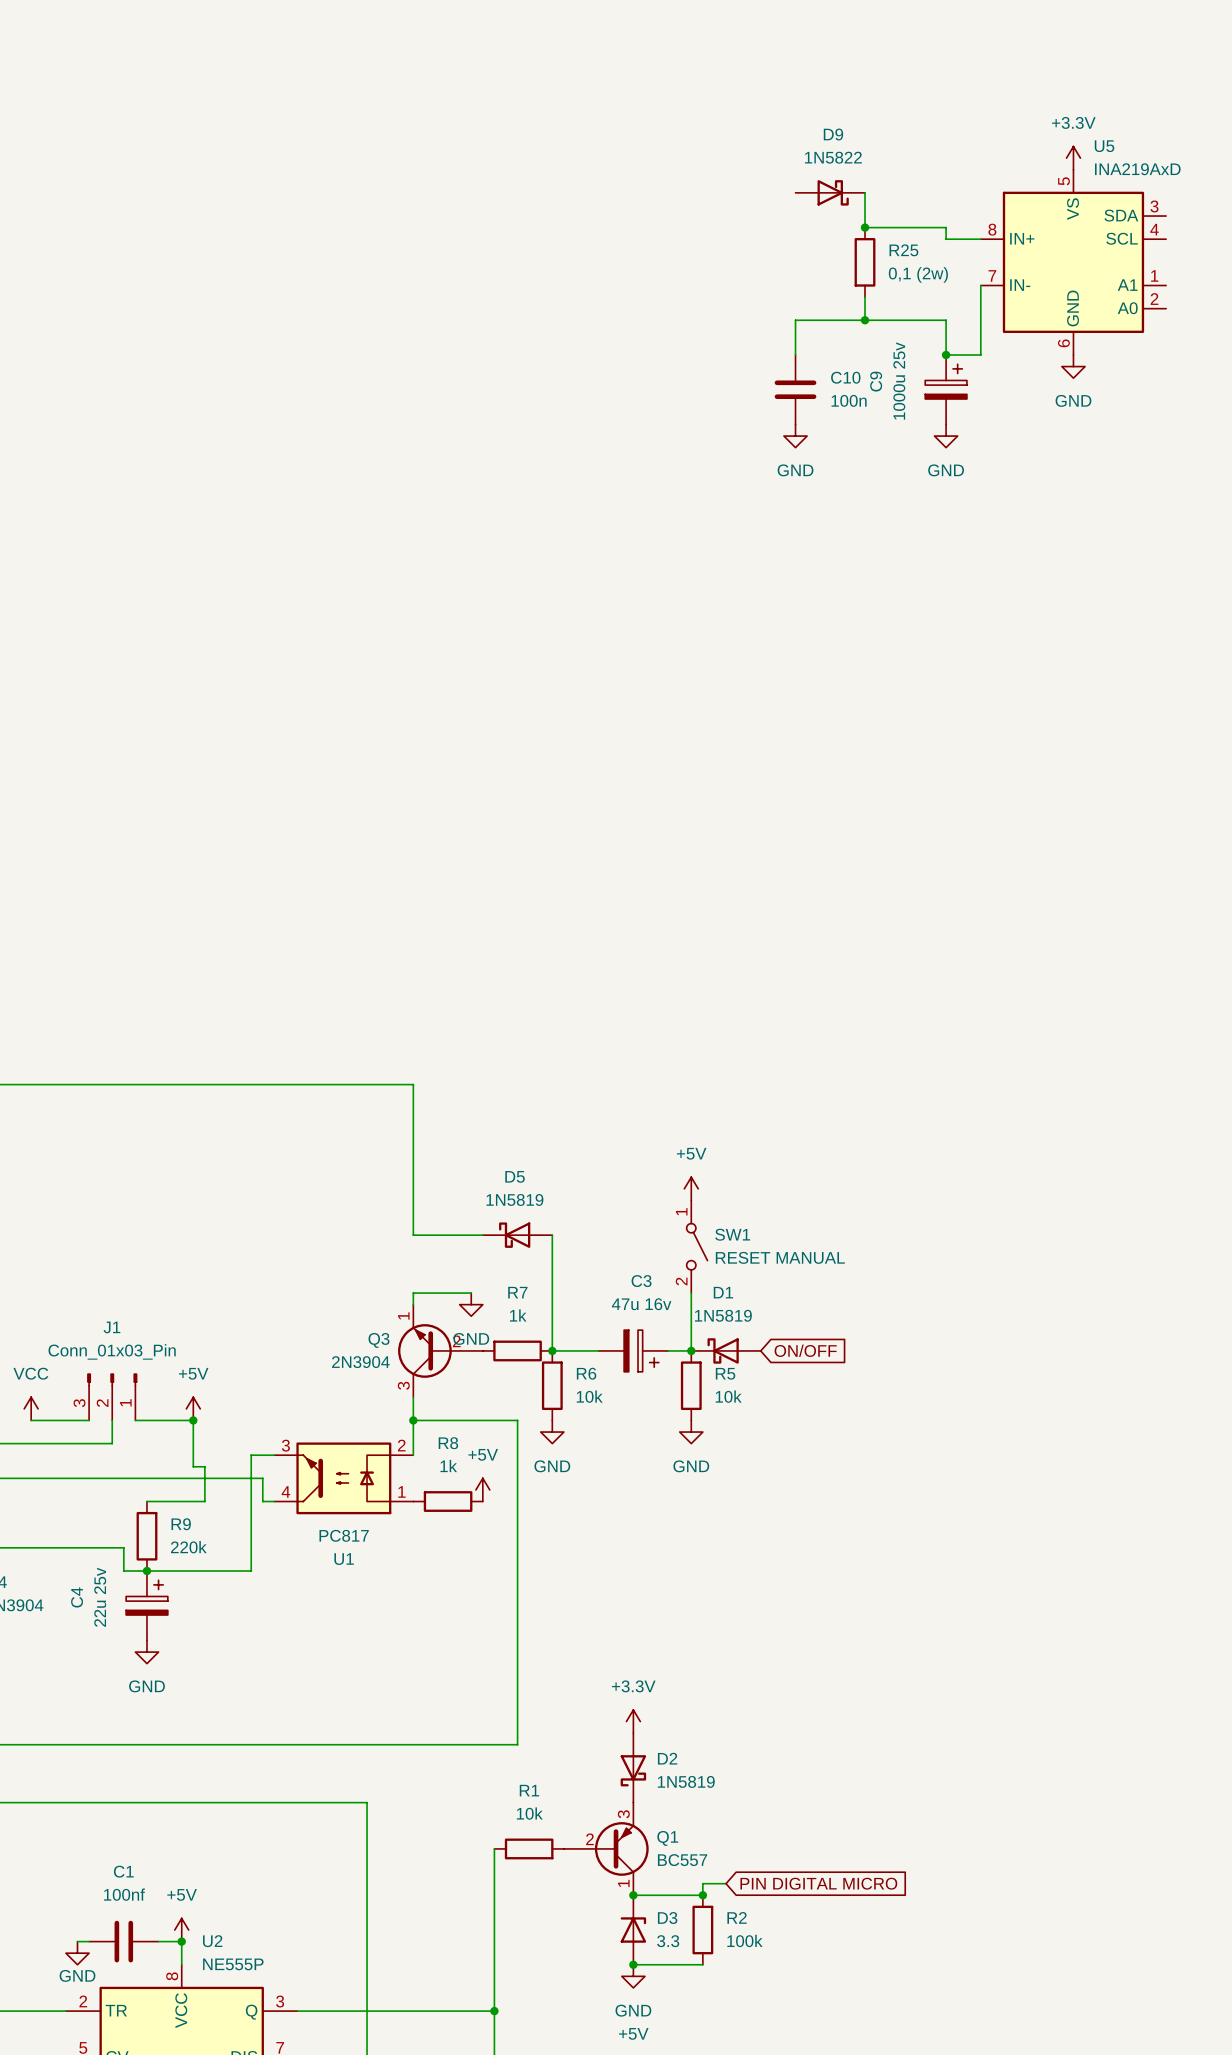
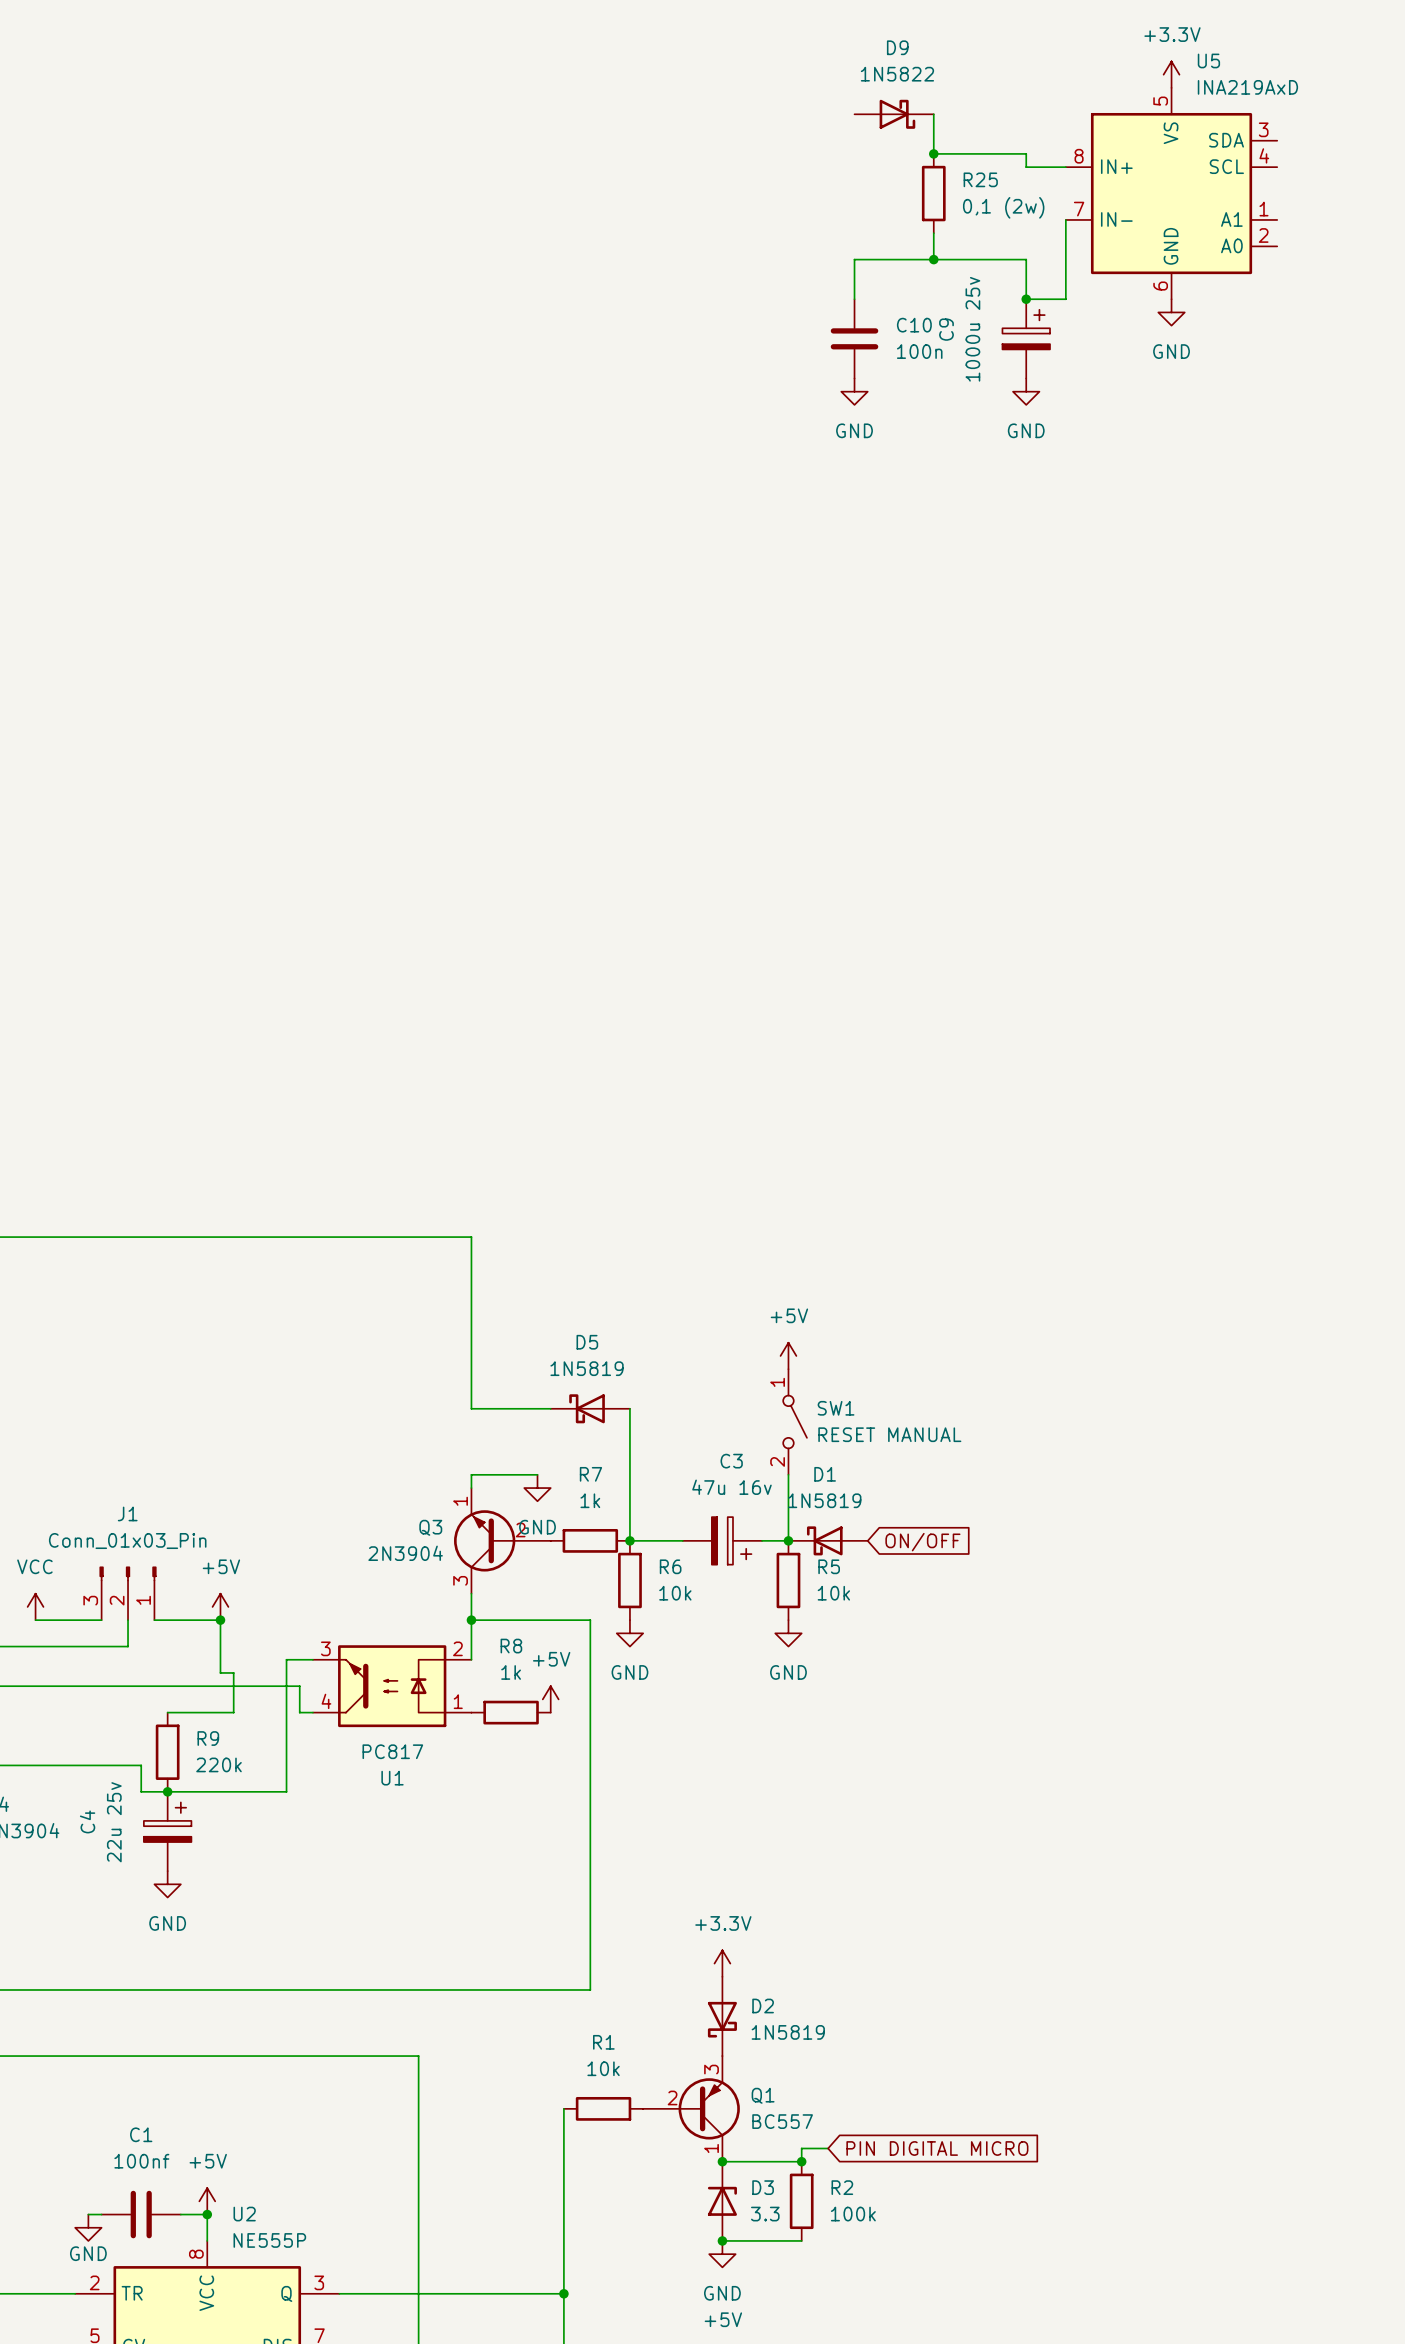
wire: none -> (933, 114) (933, 153) (1026, 153) (1026, 167) (1065, 167)
junction: none -> (933, 153)
power symbol position: +3.3V (1073, 158) -> +3.3V (1171, 74)
D9 position: (830, 192) -> (894, 114)
wire: (865, 192) (865, 227) -> (854, 299) (854, 259) (986, 259)
junction: none -> (933, 259)
junction: (865, 227) -> none
wire: (899, 227) (946, 227) (946, 239) (980, 239) -> (1026, 259) (1026, 299) (1065, 299) (1065, 219)
R25 position: (865, 262) -> (933, 193)
junction: none -> (1026, 299)
U5 position: (1073, 262) -> (1171, 193)
power symbol: none -> GND (1171, 312)
wire: (980, 285) (980, 354) (946, 354) (946, 320) (795, 320) (795, 354) -> none
wire: (865, 297) (865, 320) -> (933, 233) (933, 259)
junction: (865, 320) -> none
power symbol: none -> GND (854, 391)
power symbol: none -> GND (1026, 391)
junction: (946, 354) -> none
power symbol: GND (1073, 366) -> none
C10 position: (795, 389) -> (854, 338)
C9 position: (946, 389) -> (1026, 338)
power symbol: GND (795, 436) -> none
power symbol: GND (946, 436) -> none

